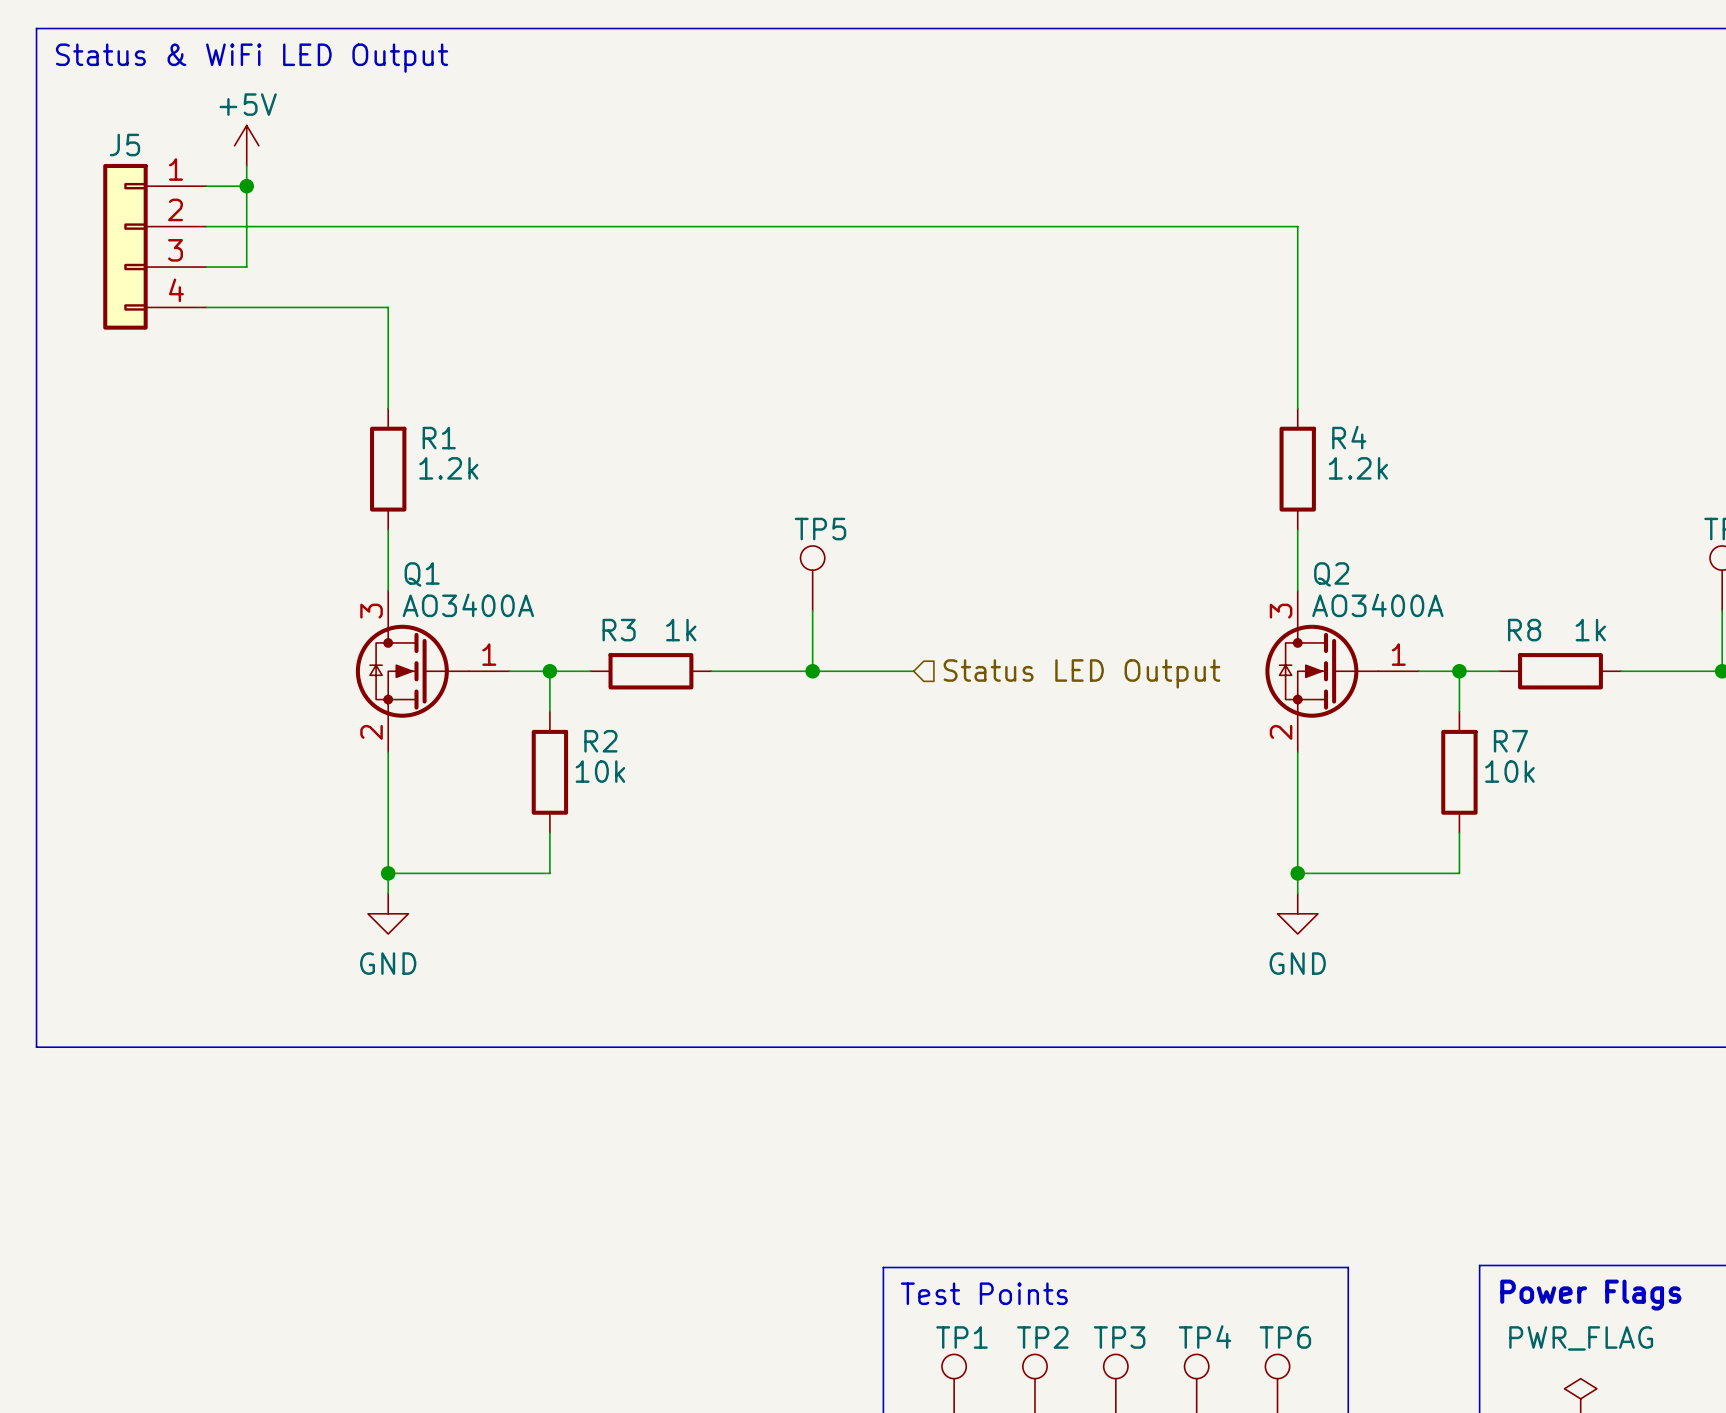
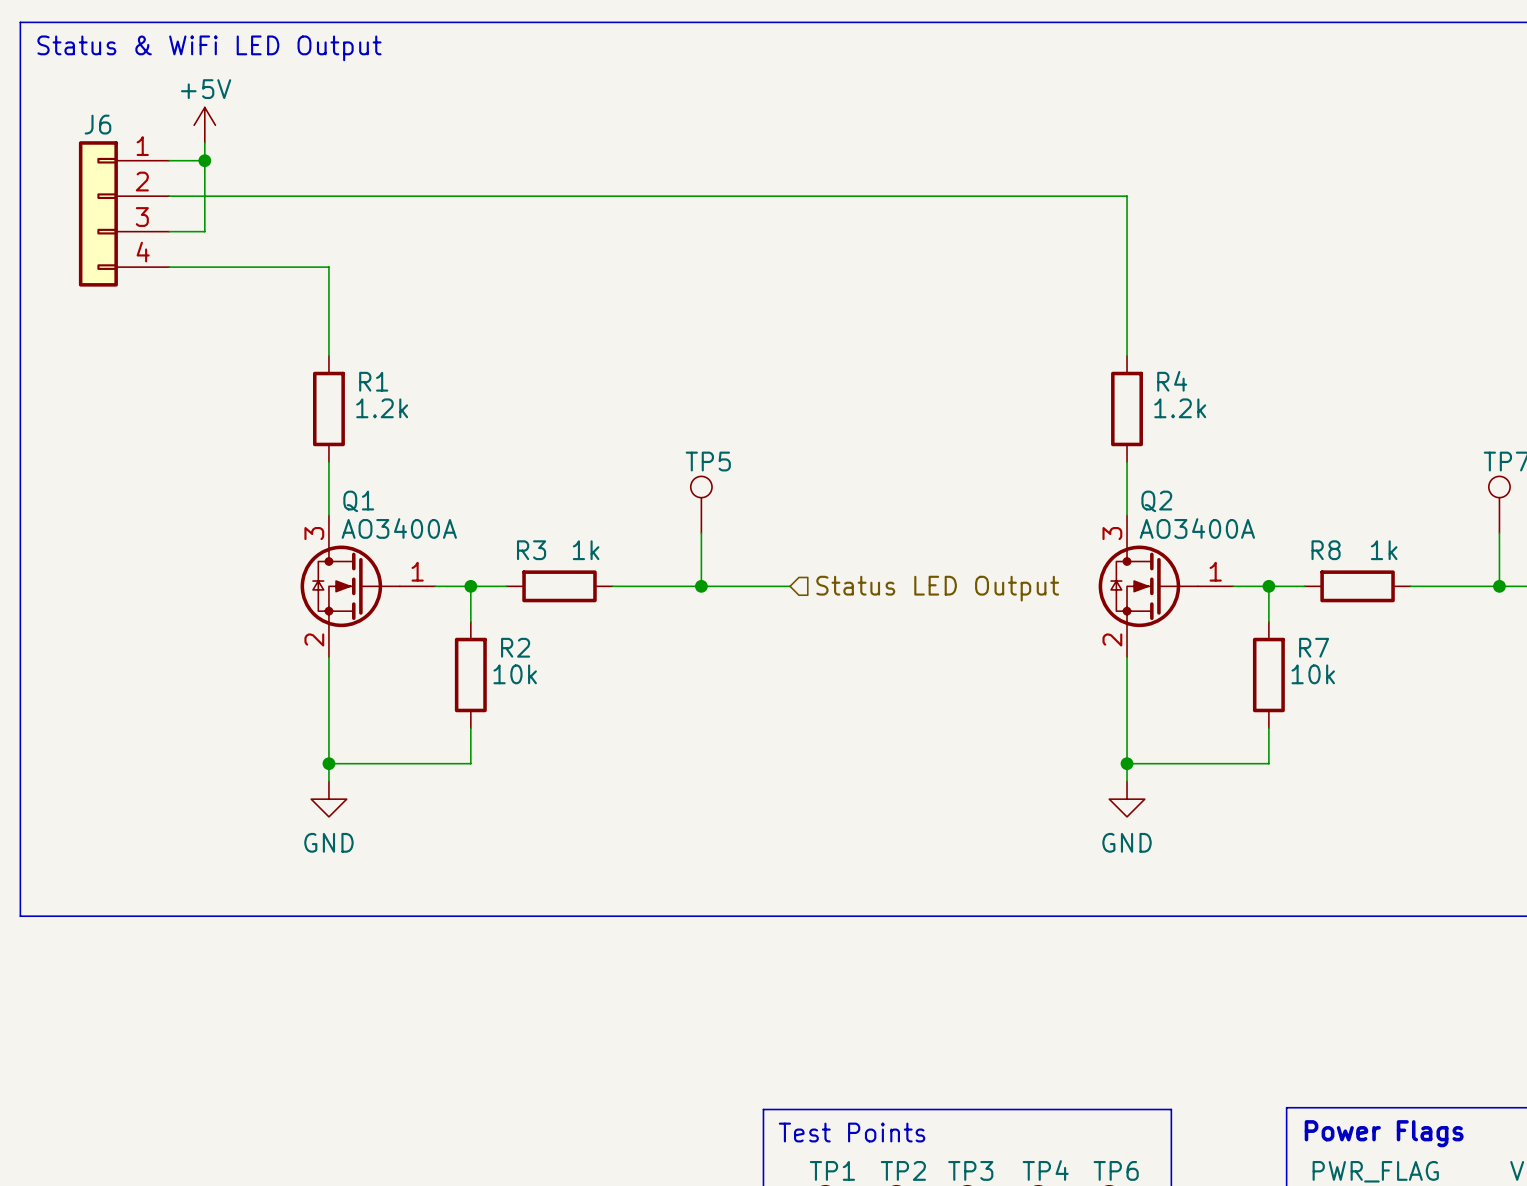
J5 name: J5 (124, 145) -> J6 (97, 124)

